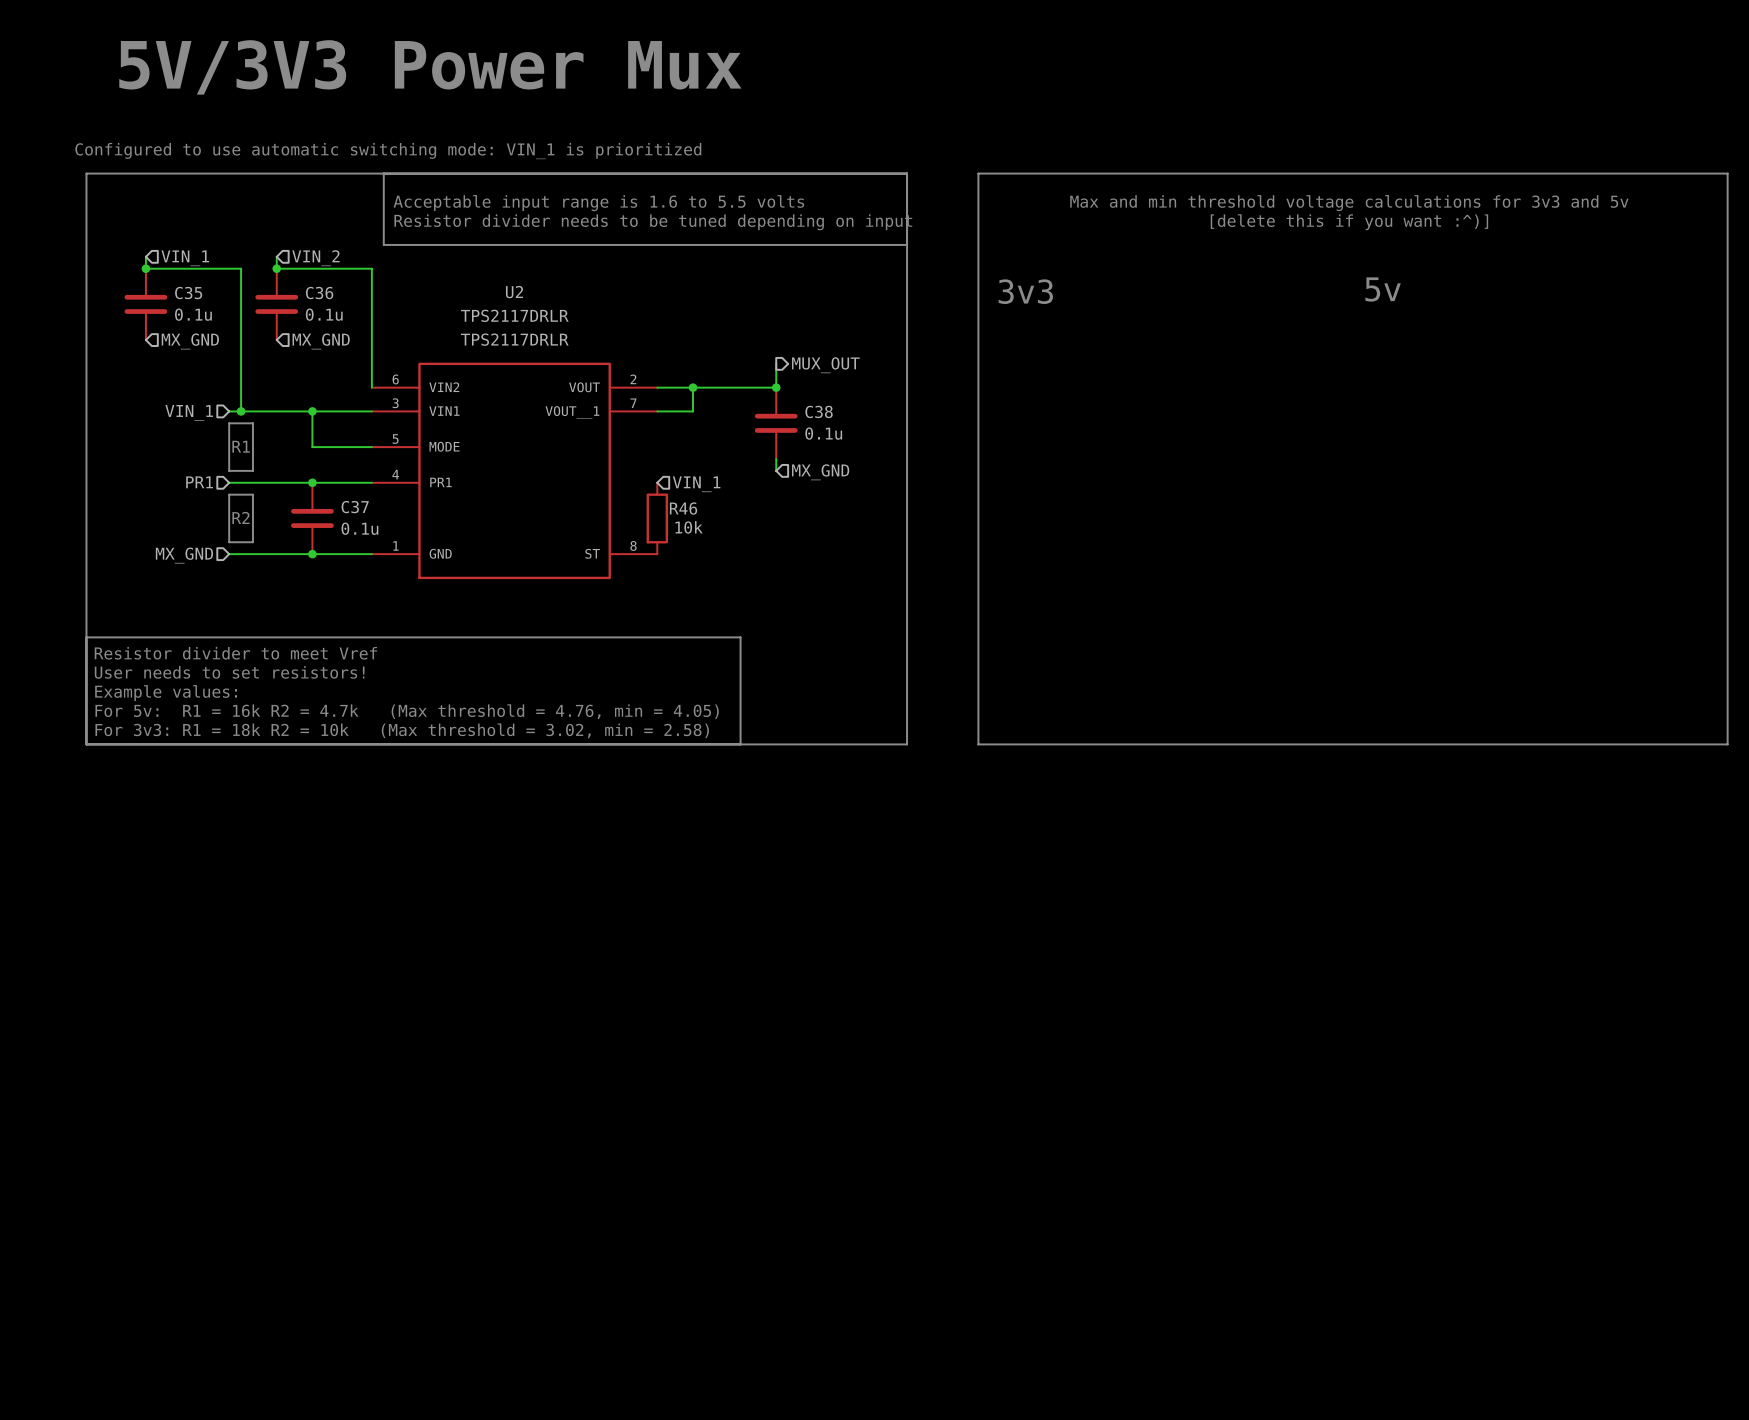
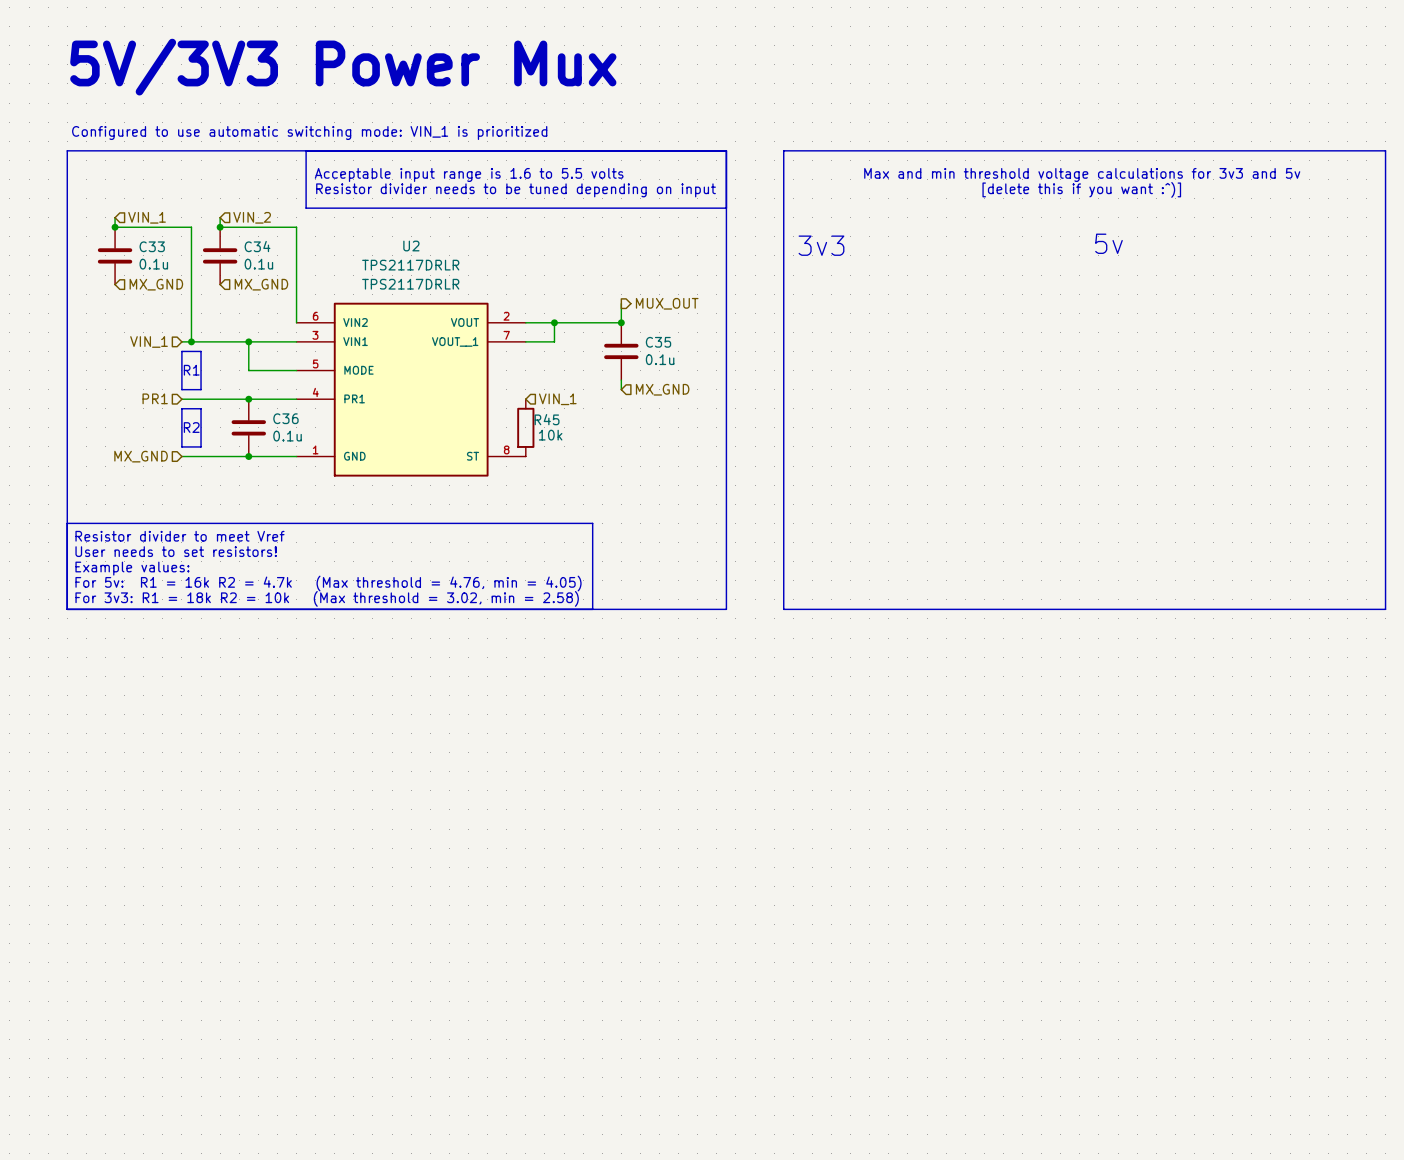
C35 name: C35 (188, 293) -> C33 (152, 246)
C36 name: C36 (319, 293) -> C34 (257, 246)
C38 name: C38 (819, 411) -> C35 (658, 342)
C37 name: C37 (355, 507) -> C36 (285, 418)
R46 name: R46 (683, 508) -> R45 (547, 419)

